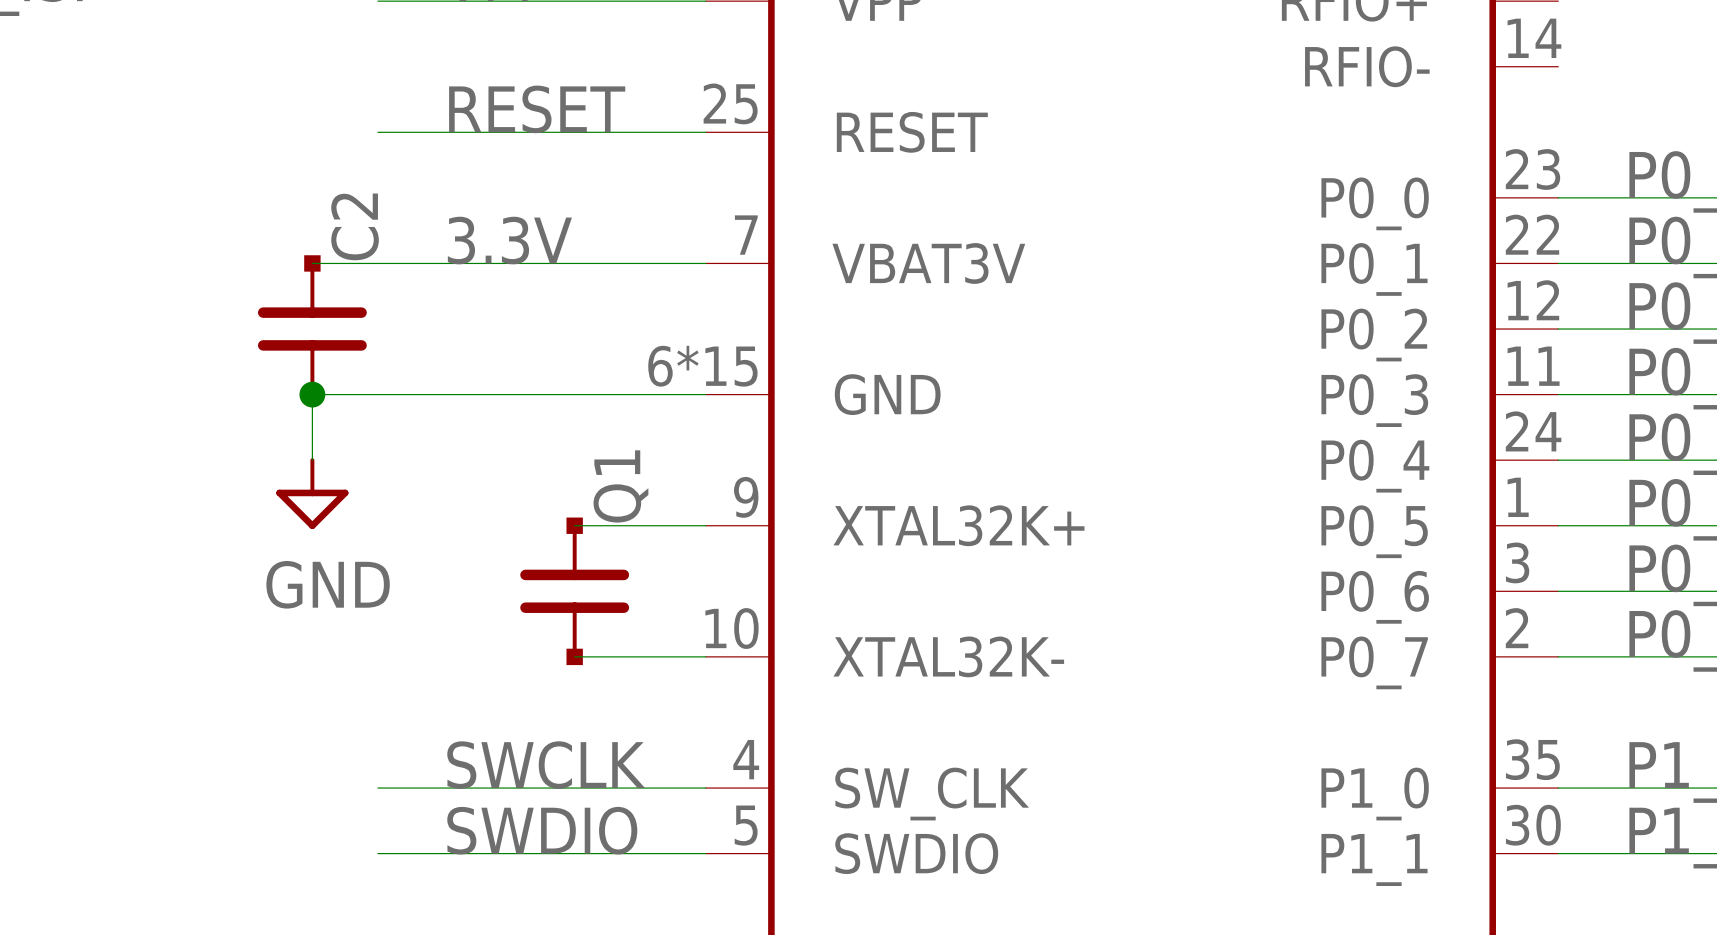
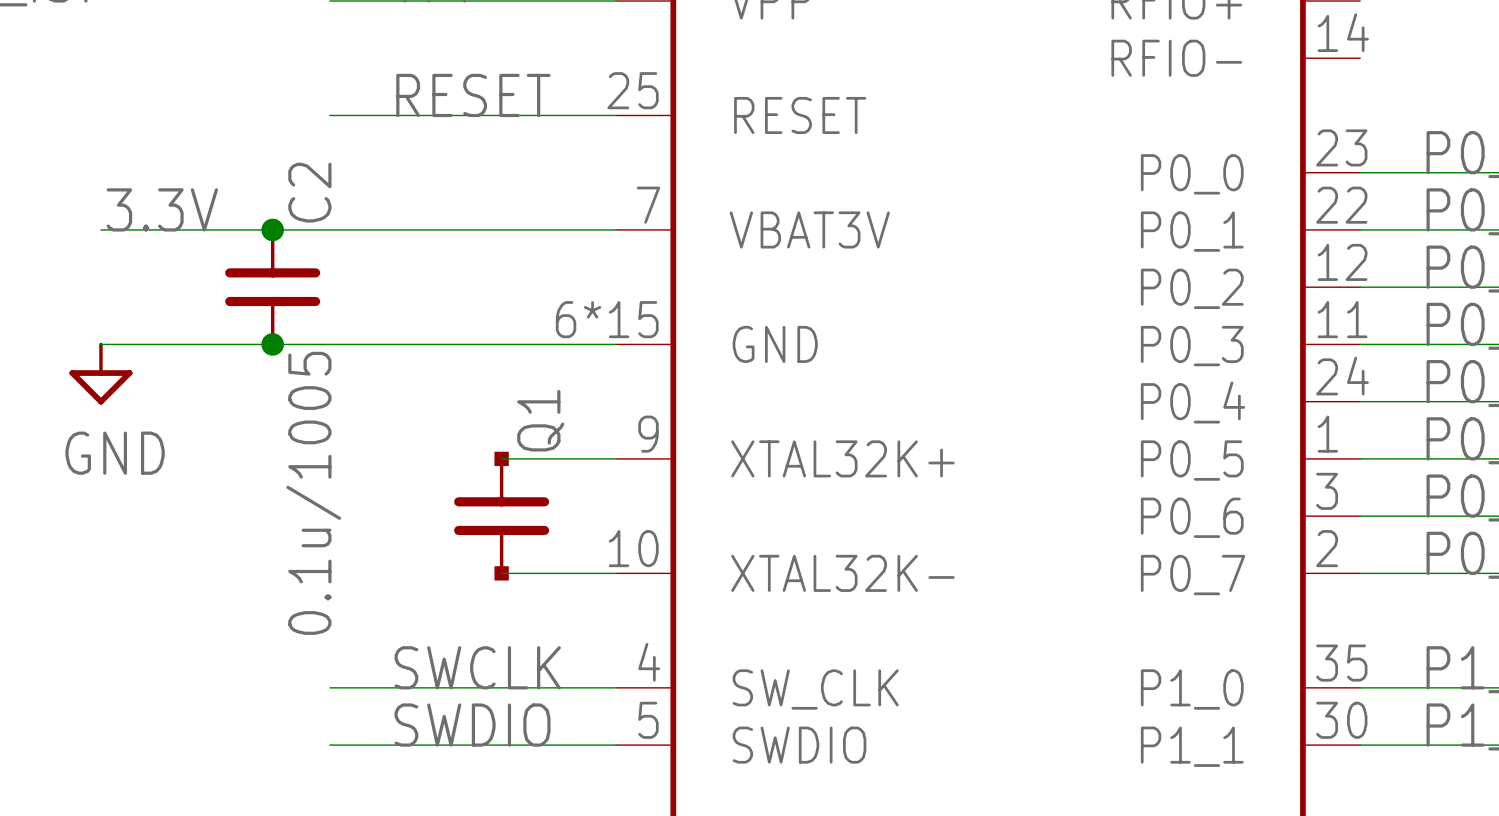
label position: 3.3V (509, 240) -> 3.3V (162, 209)
wire: none -> (100, 229) (272, 229)
junction: none -> (272, 229)
wire: (312, 394) (312, 460) -> (272, 344) (100, 344)
power symbol position: GND (312, 493) -> GND (100, 373)
C2 value: none -> 0.1u/1005 (313, 493)

